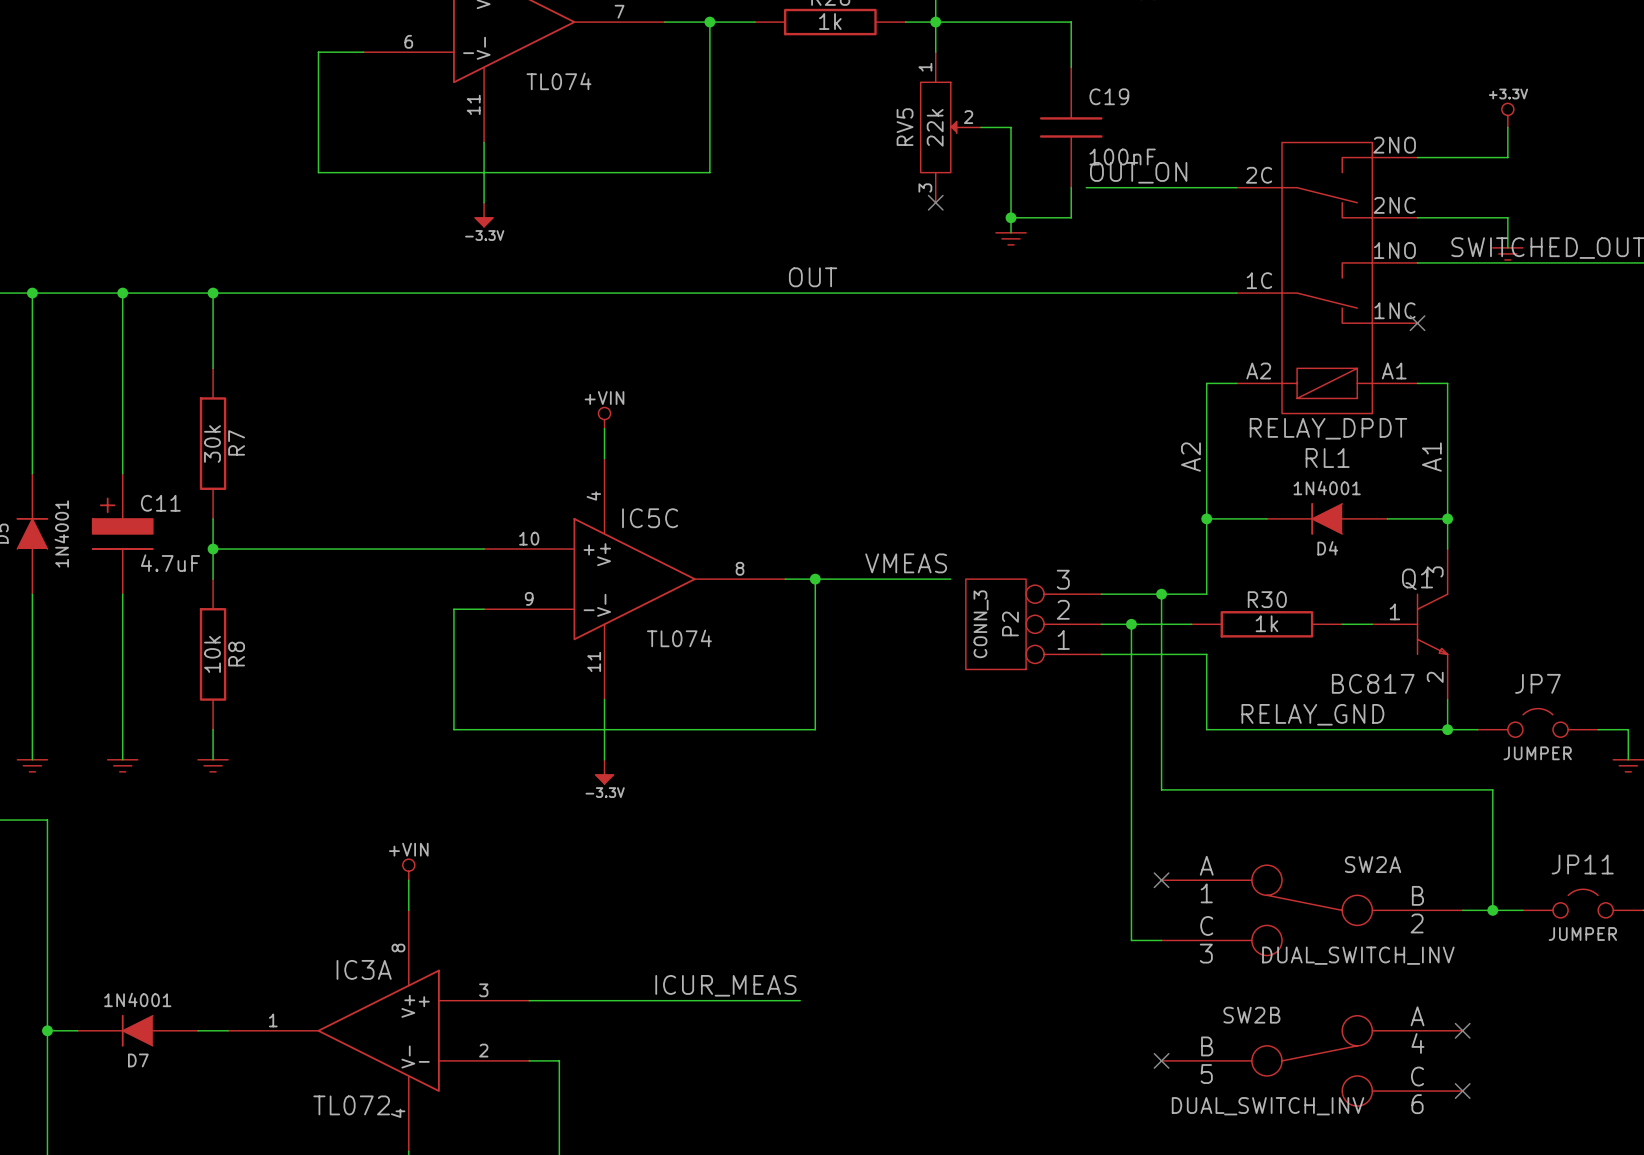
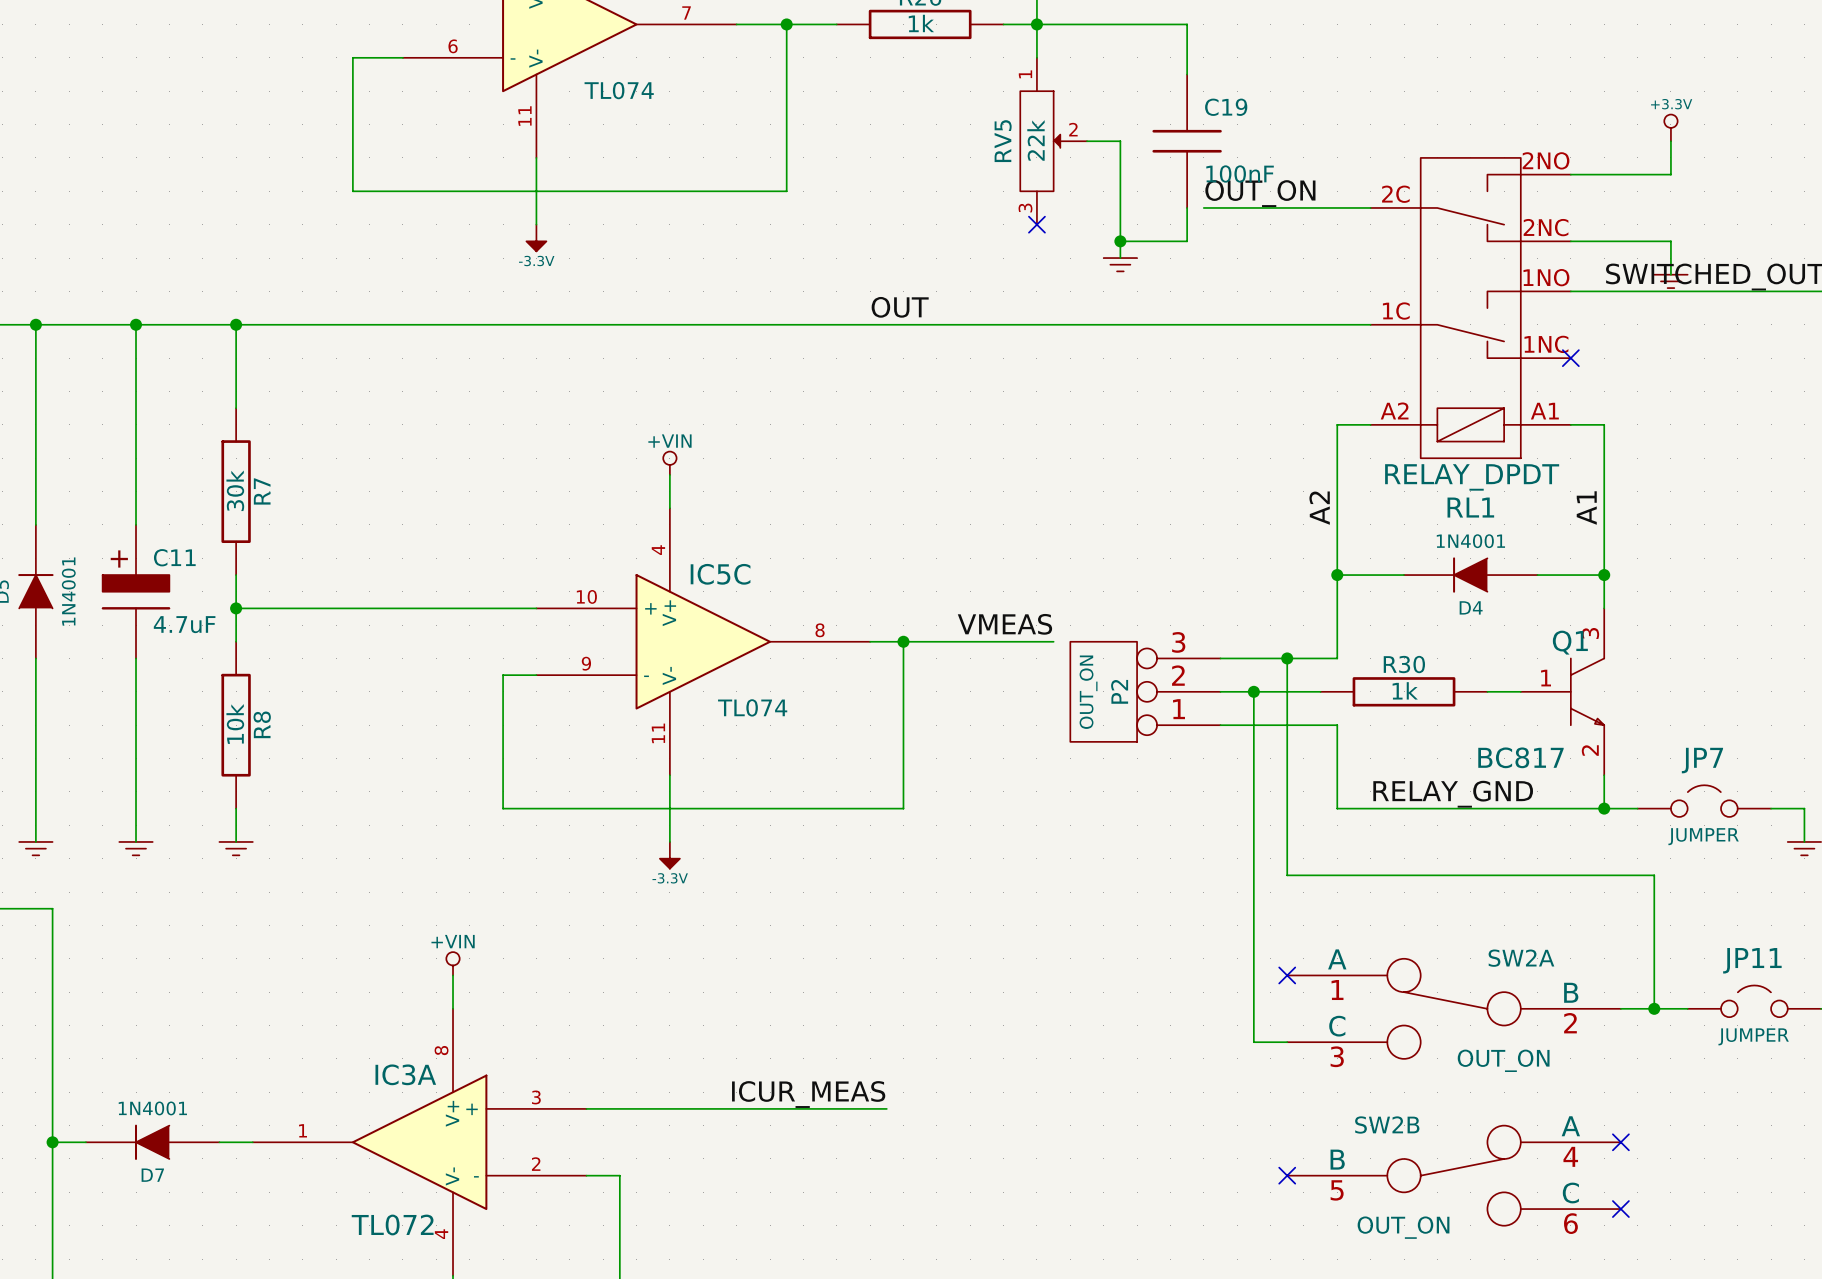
P2 value: CONN_3 (981, 624) -> OUT_ON (1088, 692)
SW2A value: DUAL_SWITCH_INV (1358, 955) -> OUT_ON (1503, 1060)
SW2B value: DUAL_SWITCH_INV (1268, 1106) -> OUT_ON (1403, 1227)

